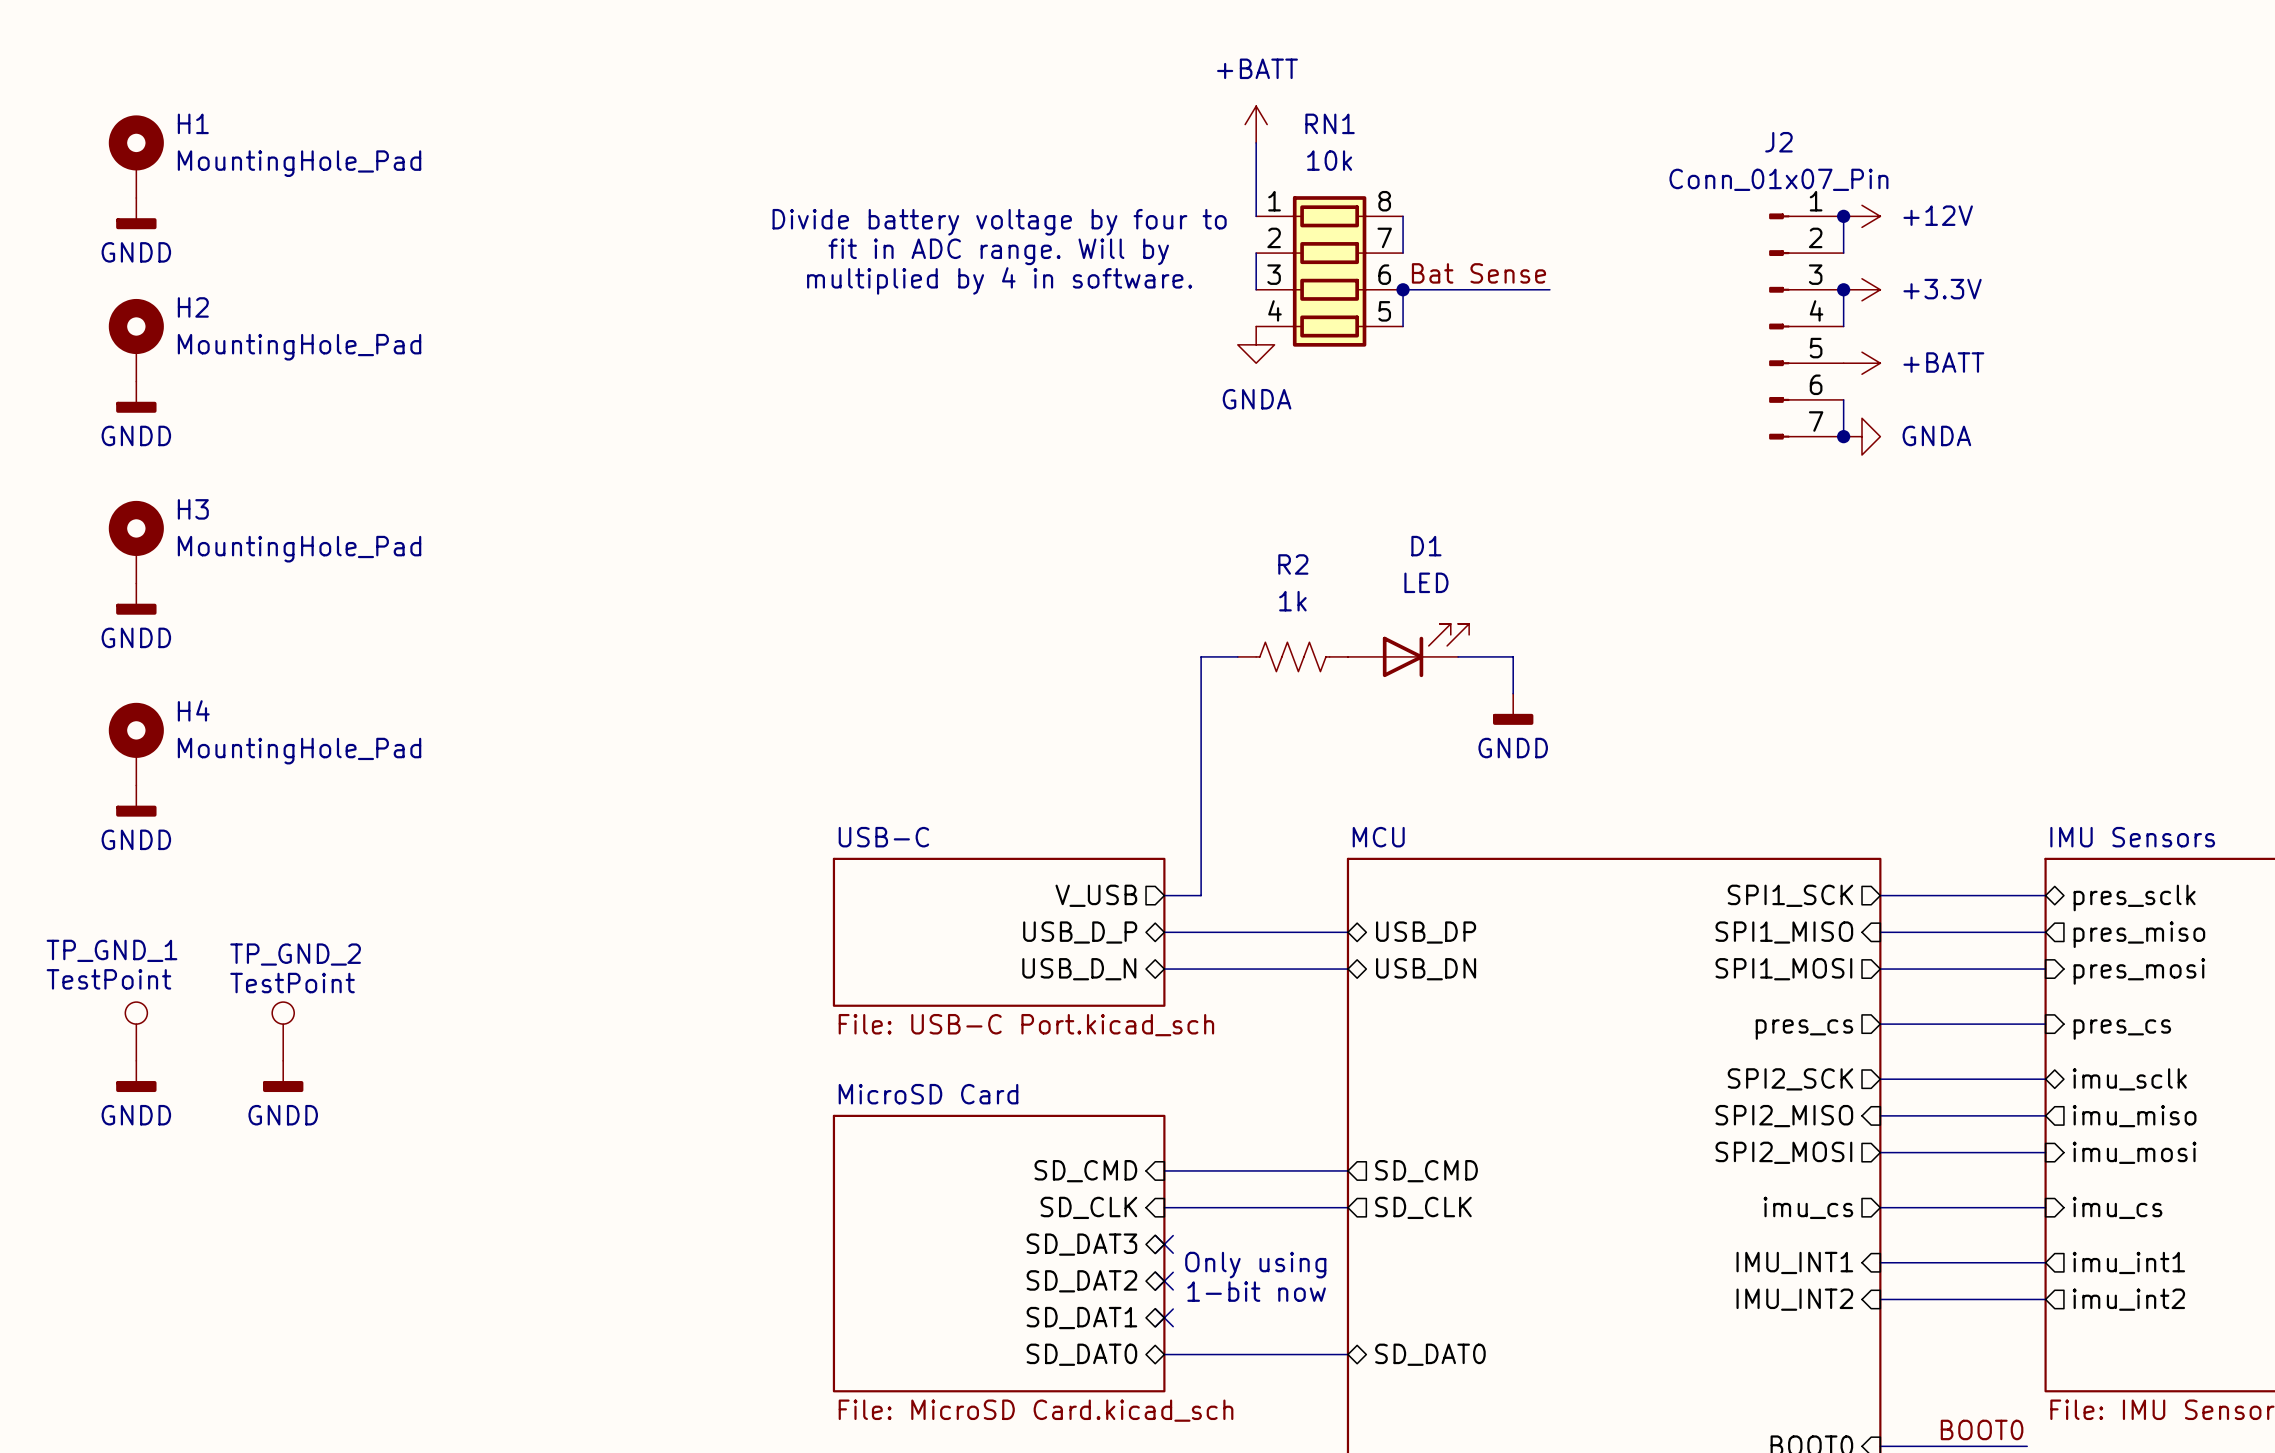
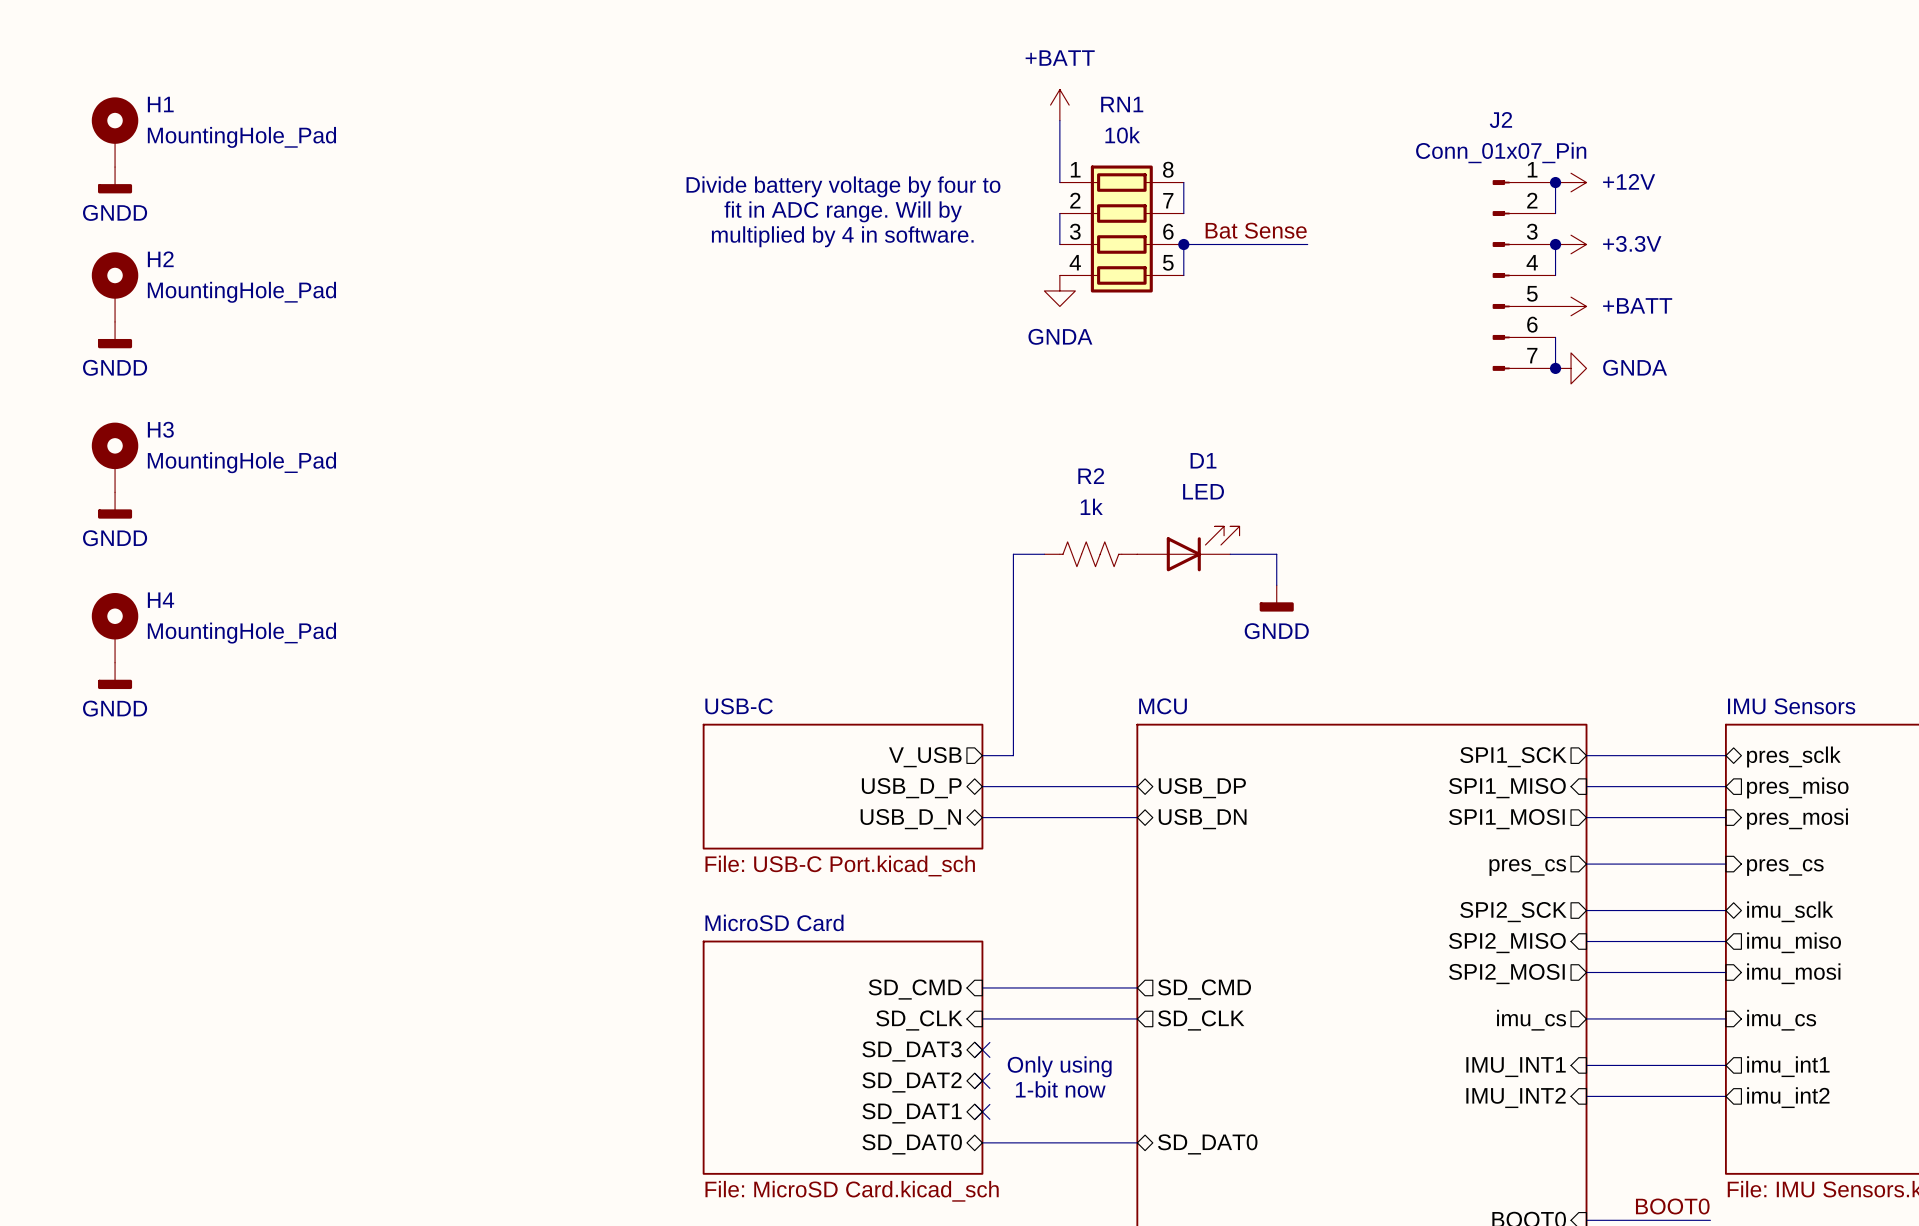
TP_GND_1: TestPoint (136, 1031) -> none
TP_GND_2: TestPoint (283, 1031) -> none
power symbol: GNDD (136, 1076) -> none
power symbol: GNDD (283, 1076) -> none

